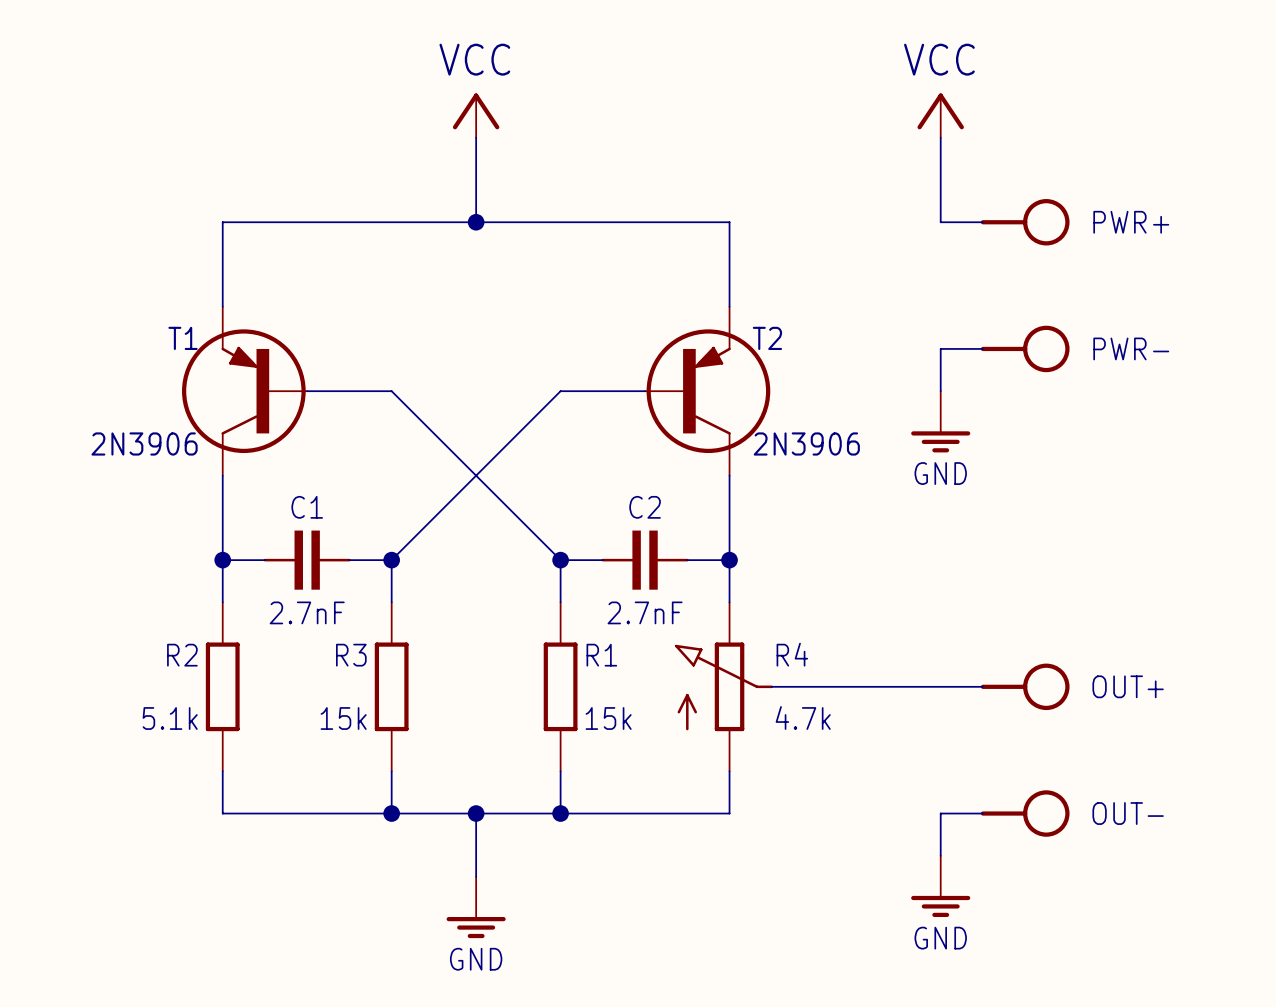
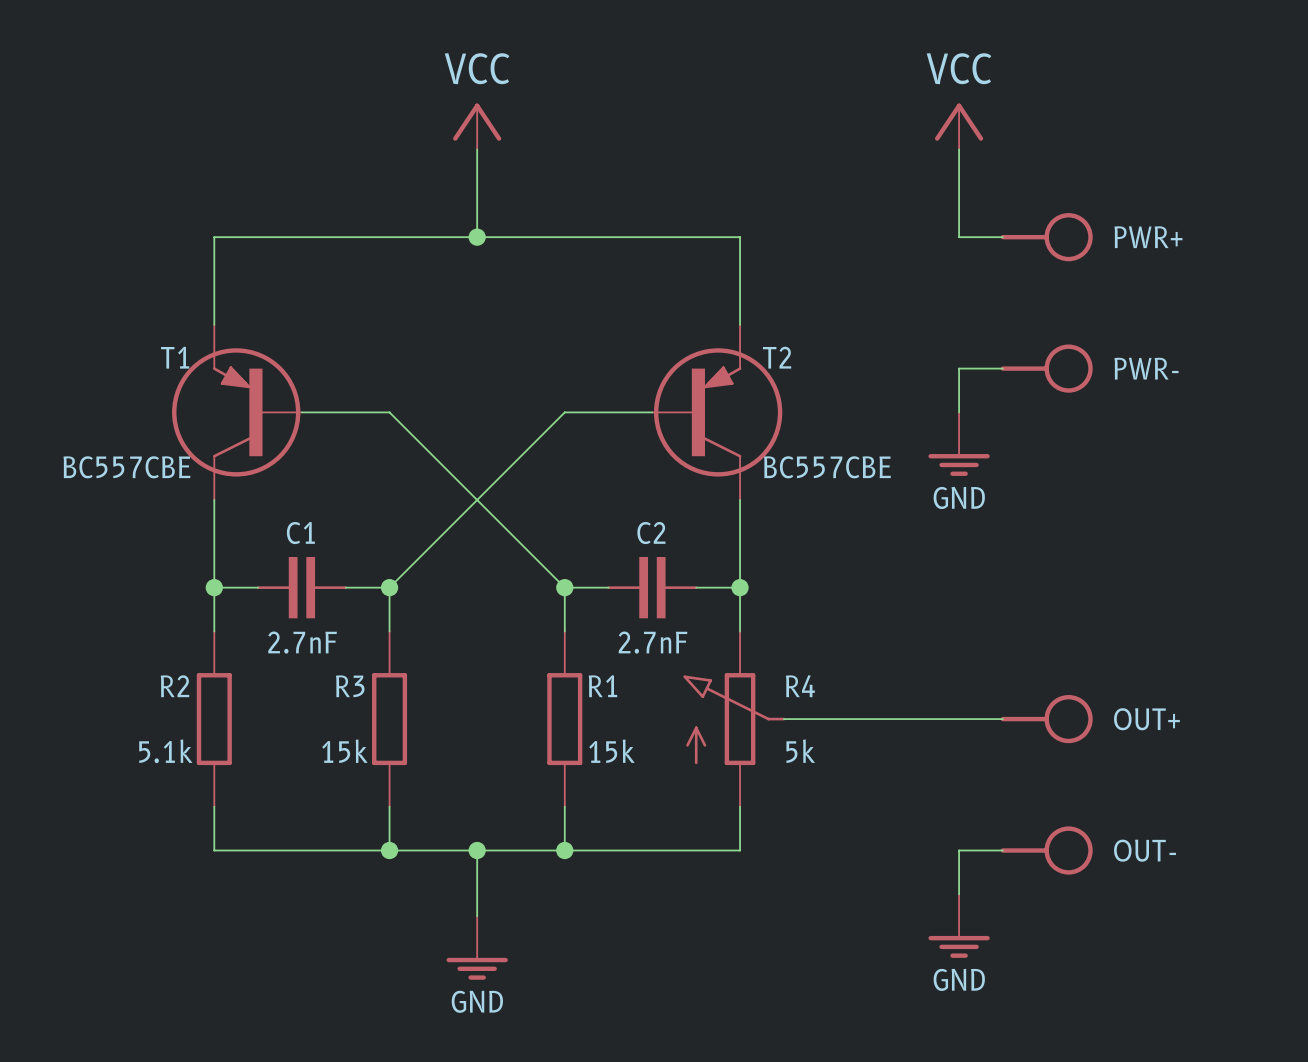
T1 value: 2N3906 (144, 443) -> BC557CBE (126, 467)
T2 value: 2N3906 (806, 443) -> BC557CBE (827, 467)
R4 value: 4.7k (803, 718) -> 5k (800, 751)

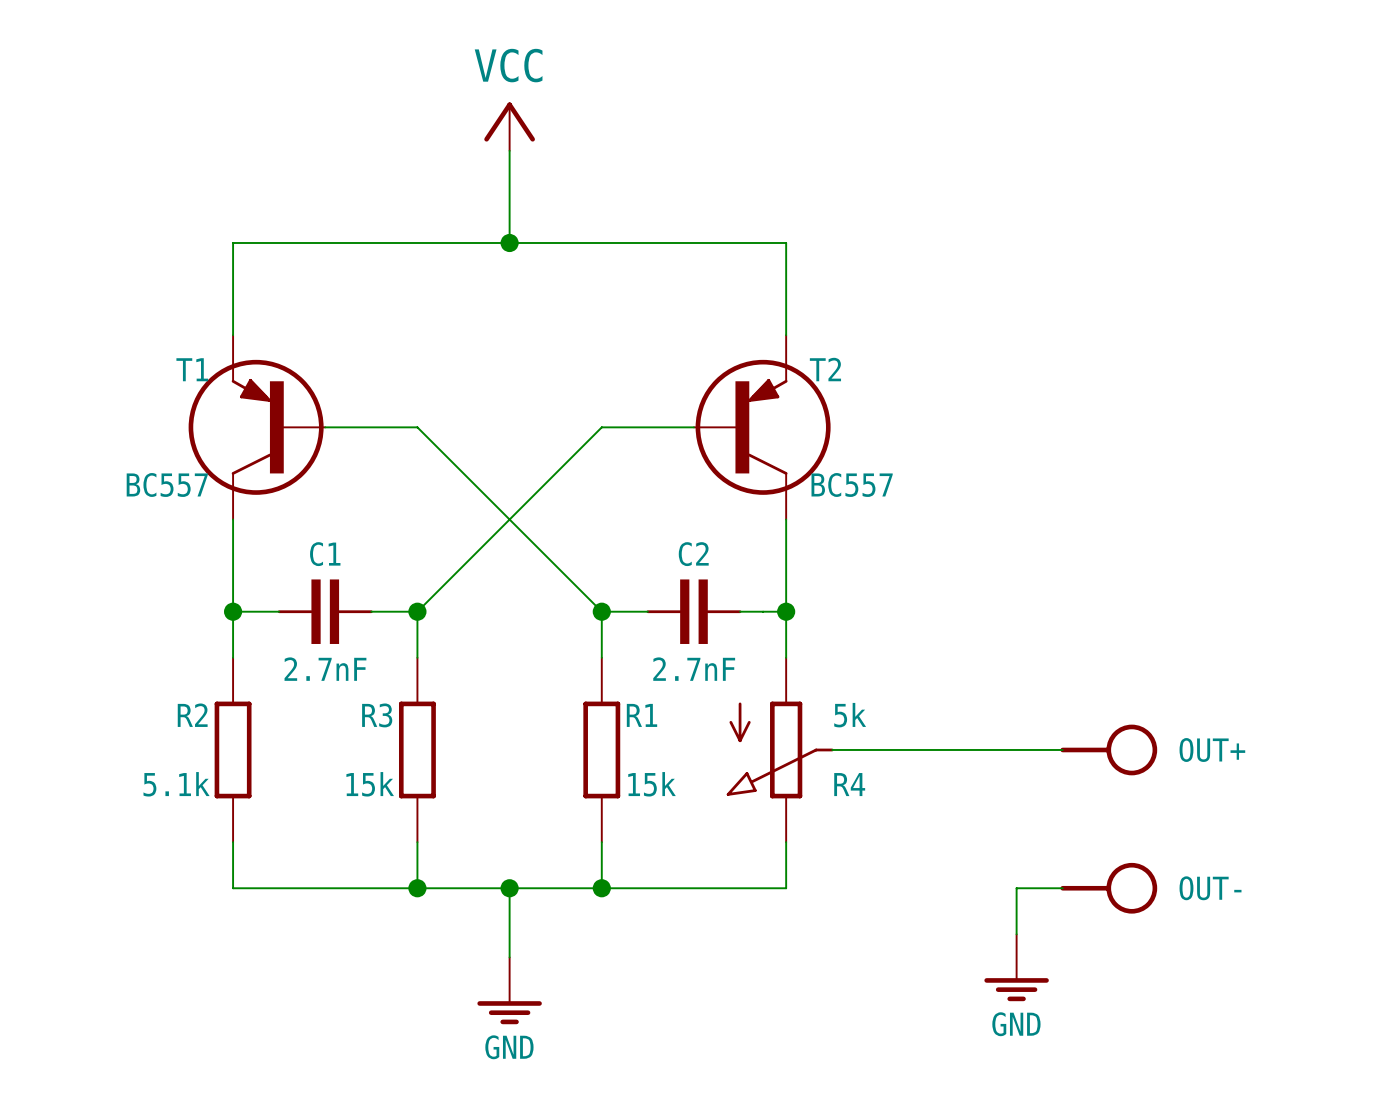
power symbol: VCC (959, 126) -> none
wire: (959, 149) (959, 237) (1002, 237) -> none
PWR+: (1046, 237) -> none
wire: (1002, 368) (959, 368) (959, 412) -> none
PWR-: (1046, 368) -> none
power symbol: GND (959, 444) -> none
T1 value: BC557CBE (126, 467) -> BC557 (167, 484)
T2 value: BC557CBE (827, 467) -> BC557 (852, 484)
R4 flip: as is (734, 719) -> up-down (780, 749)

